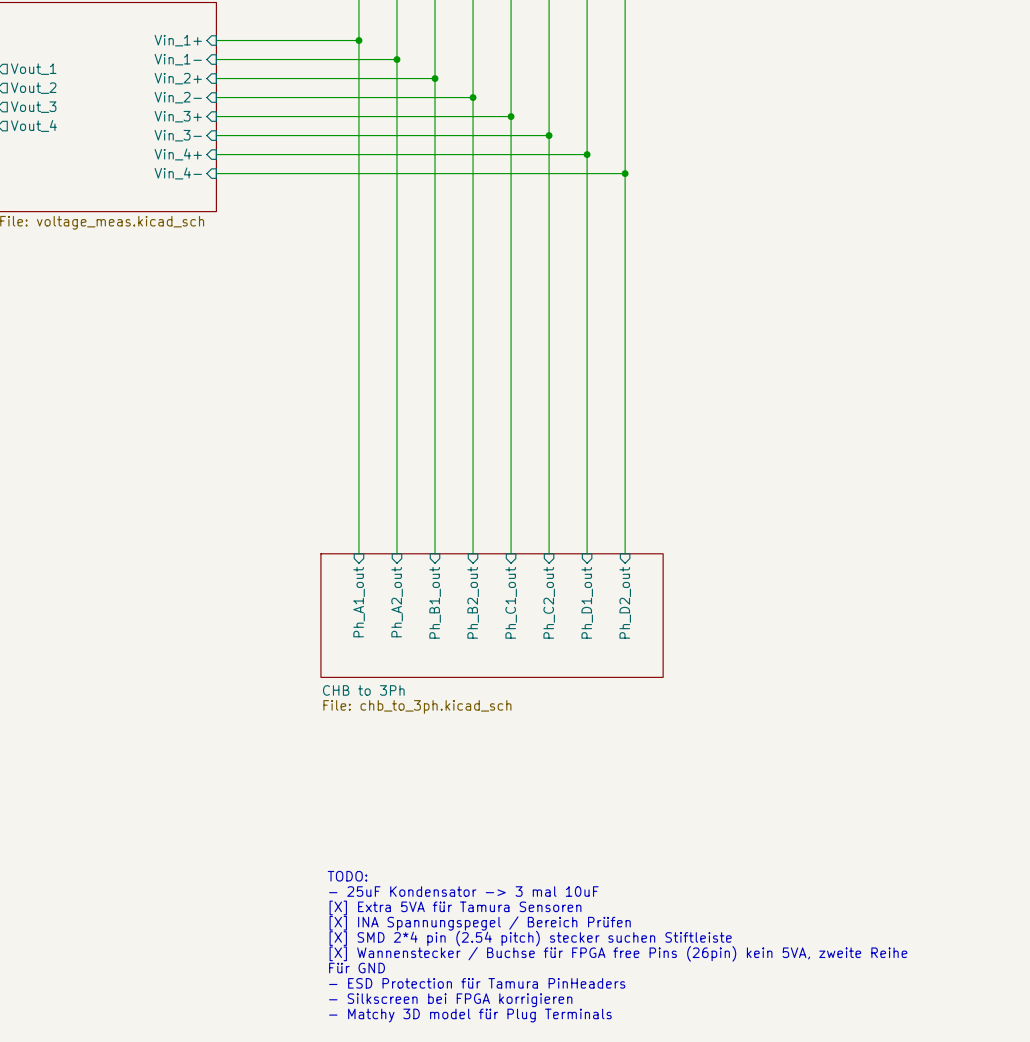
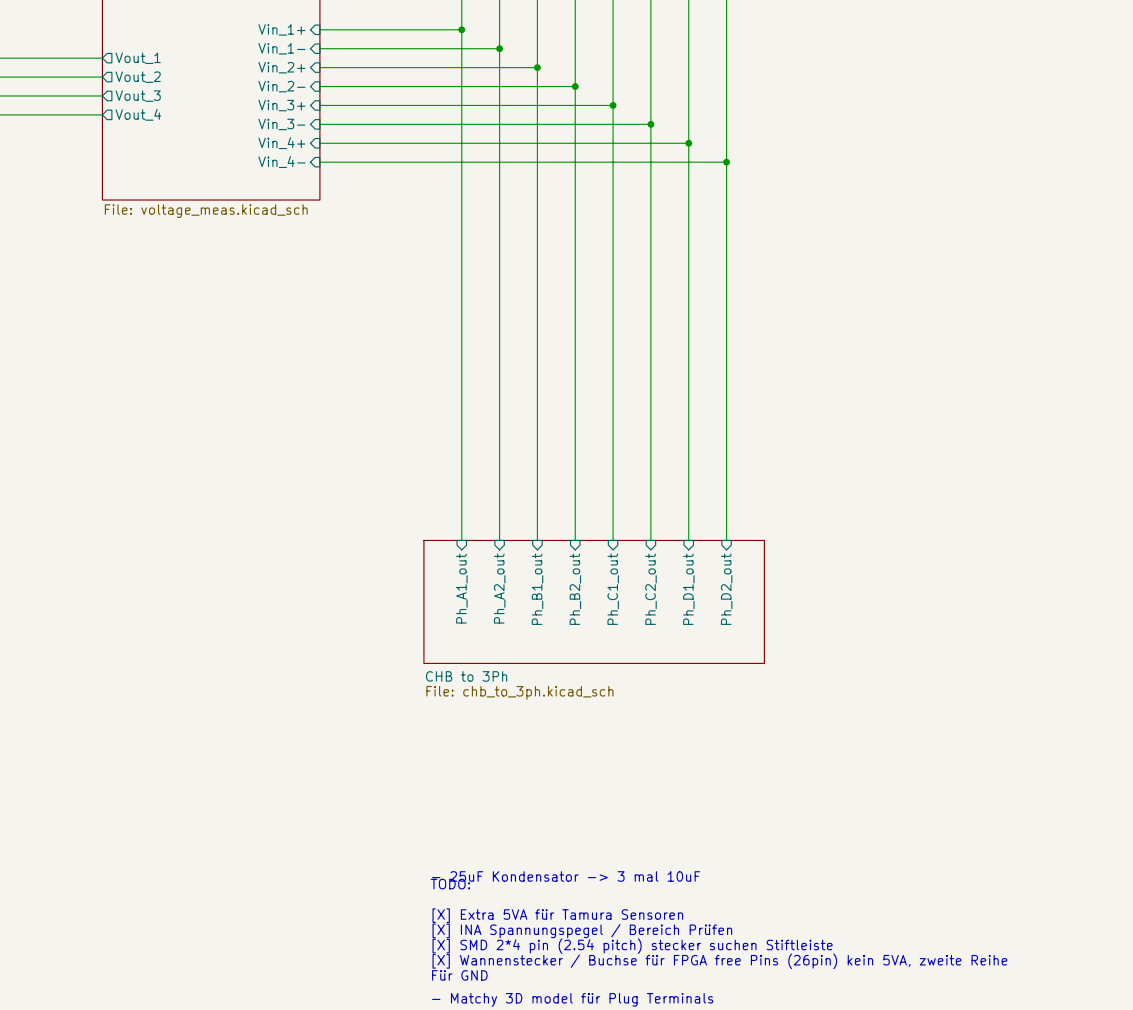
text position: TODO: (347, 876) -> TODO: (450, 884)
text position: [X] Extra 5VA für Tamura Sensoren (455, 907) -> [X] Extra 5VA für Tamura Sensoren (557, 915)
text position: [X] INA Spannungspegel / Bereich Prüfen (480, 923) -> [X] INA Spannungspegel / Bereich Prüfen (582, 930)
text position: [X] SMD 2*4 pin (2.54 pitch) stecker suchen Stiftleiste (530, 938) -> [X] SMD 2*4 pin (2.54 pitch) stecker suchen Stiftleiste (632, 946)
text position: [X] Wannenstecker / Buchse für FPGA free Pins (26pin) kein 5VA, zweite Reihe (618, 953) -> [X] Wannenstecker / Buchse für FPGA free Pins (26pin) kein 5VA, zweite Reihe (719, 961)
text position: Für GND (357, 968) -> Für GND (459, 975)
text: - ESD Protection für Tamura PinHeaders (477, 983) -> none
text: - Silkscreen bei FPGA korrigieren (450, 1000) -> none

